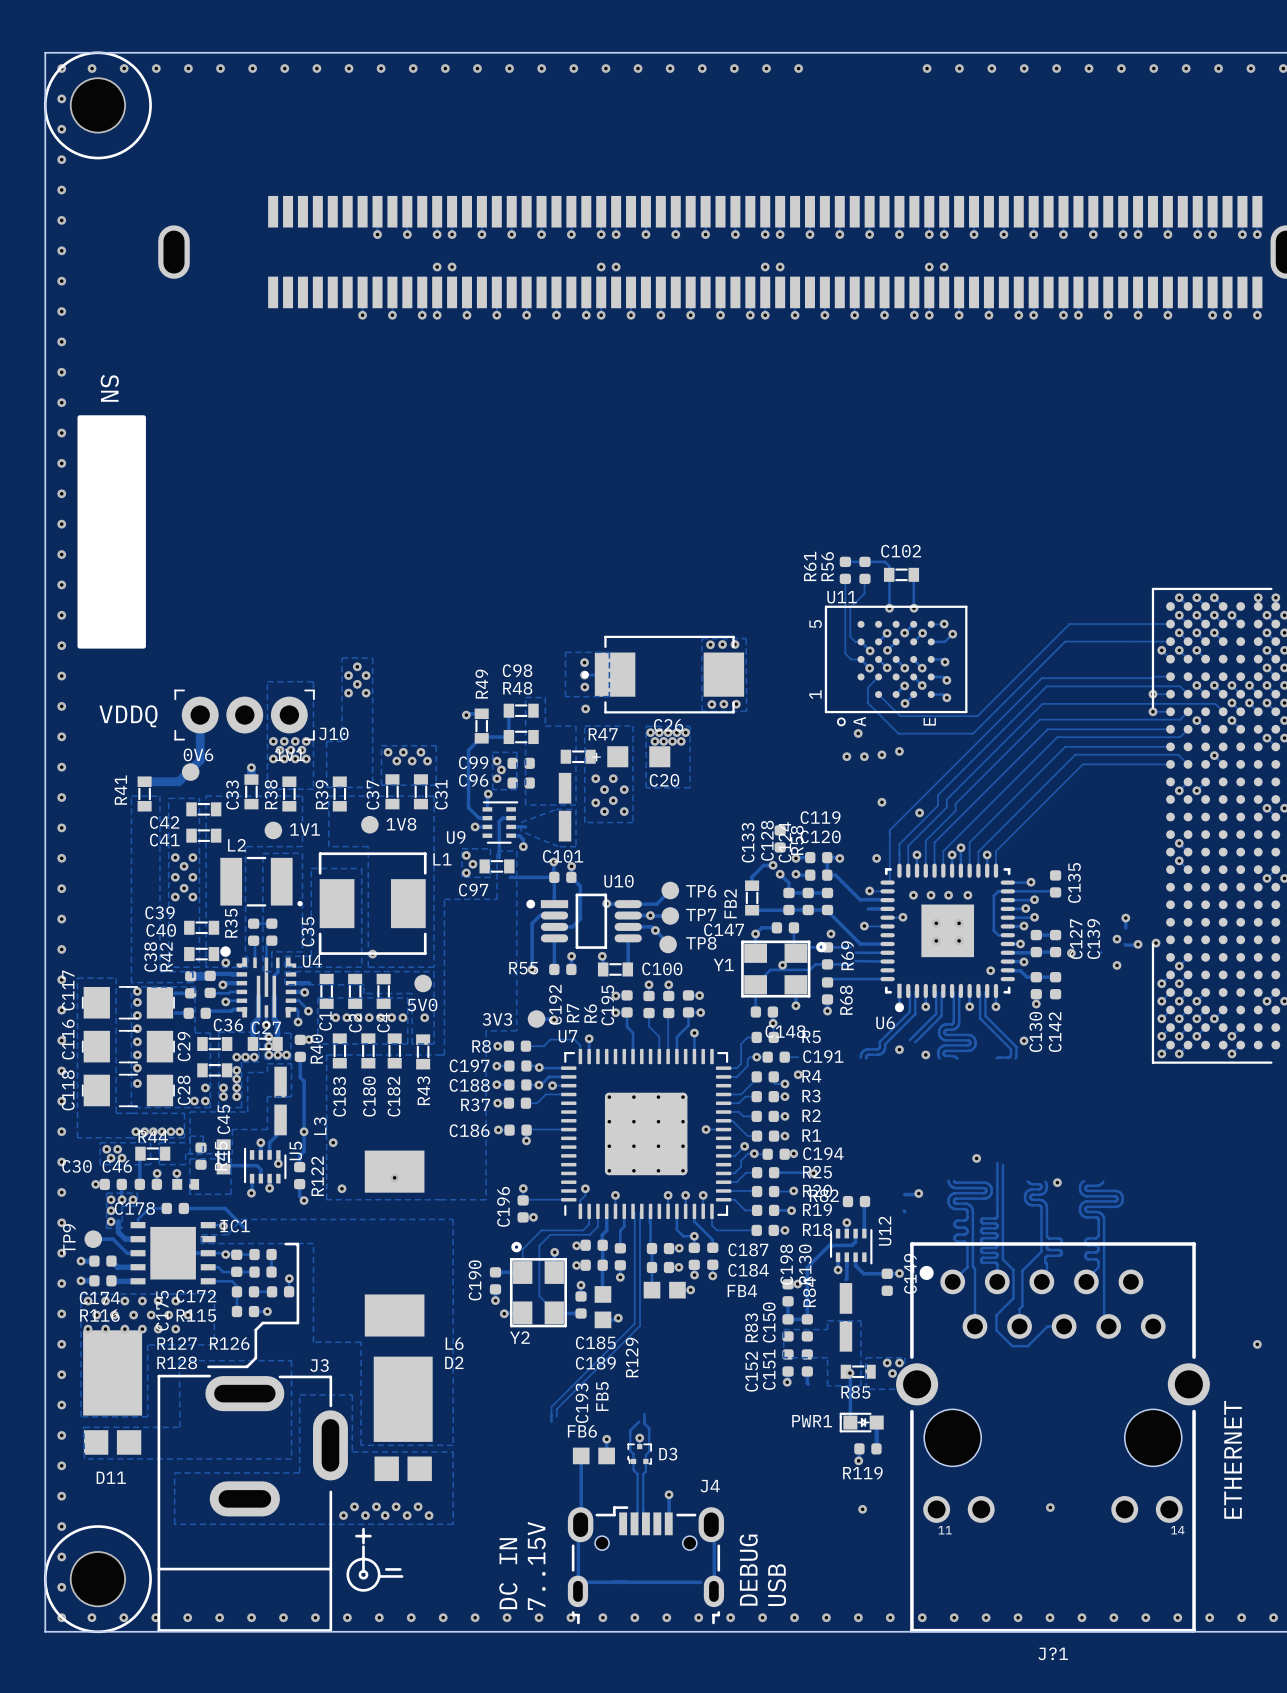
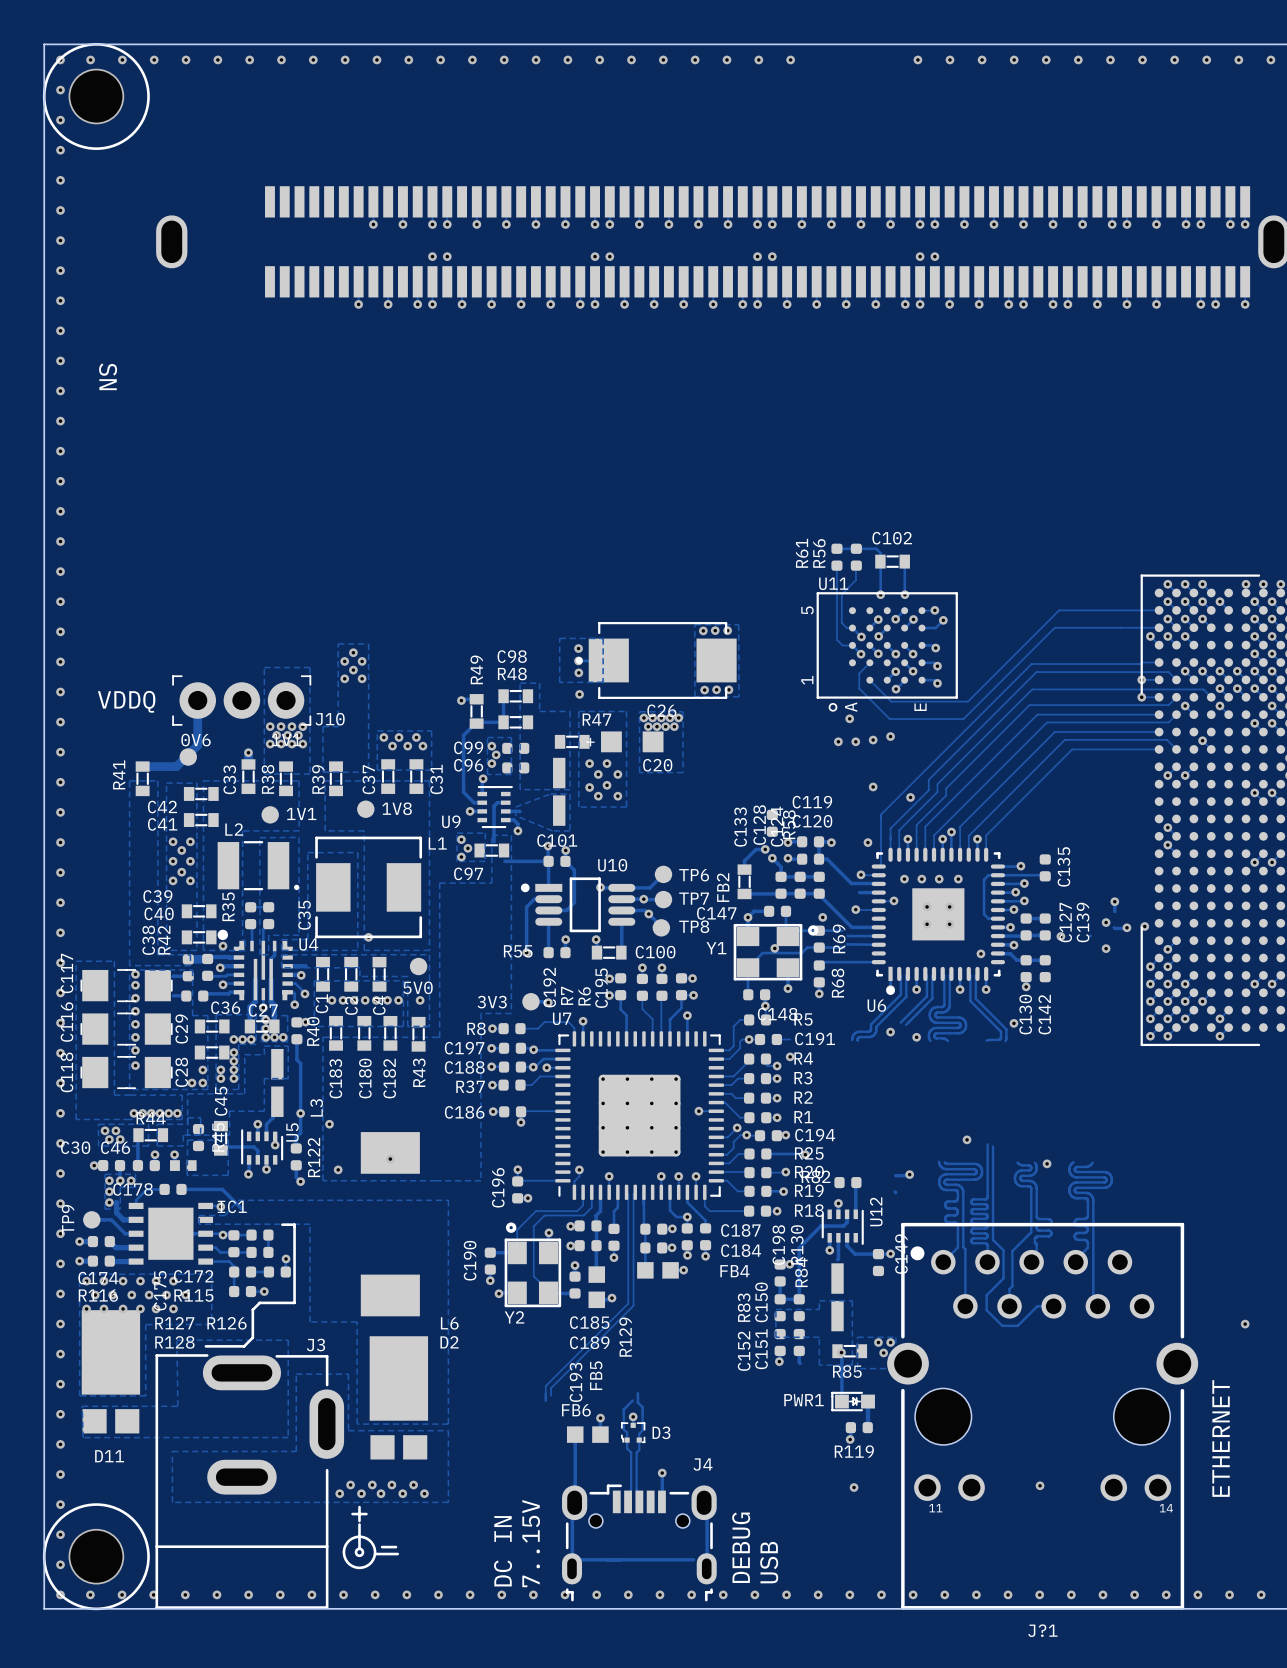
drawing: [77, 415, 146, 649] -> none

